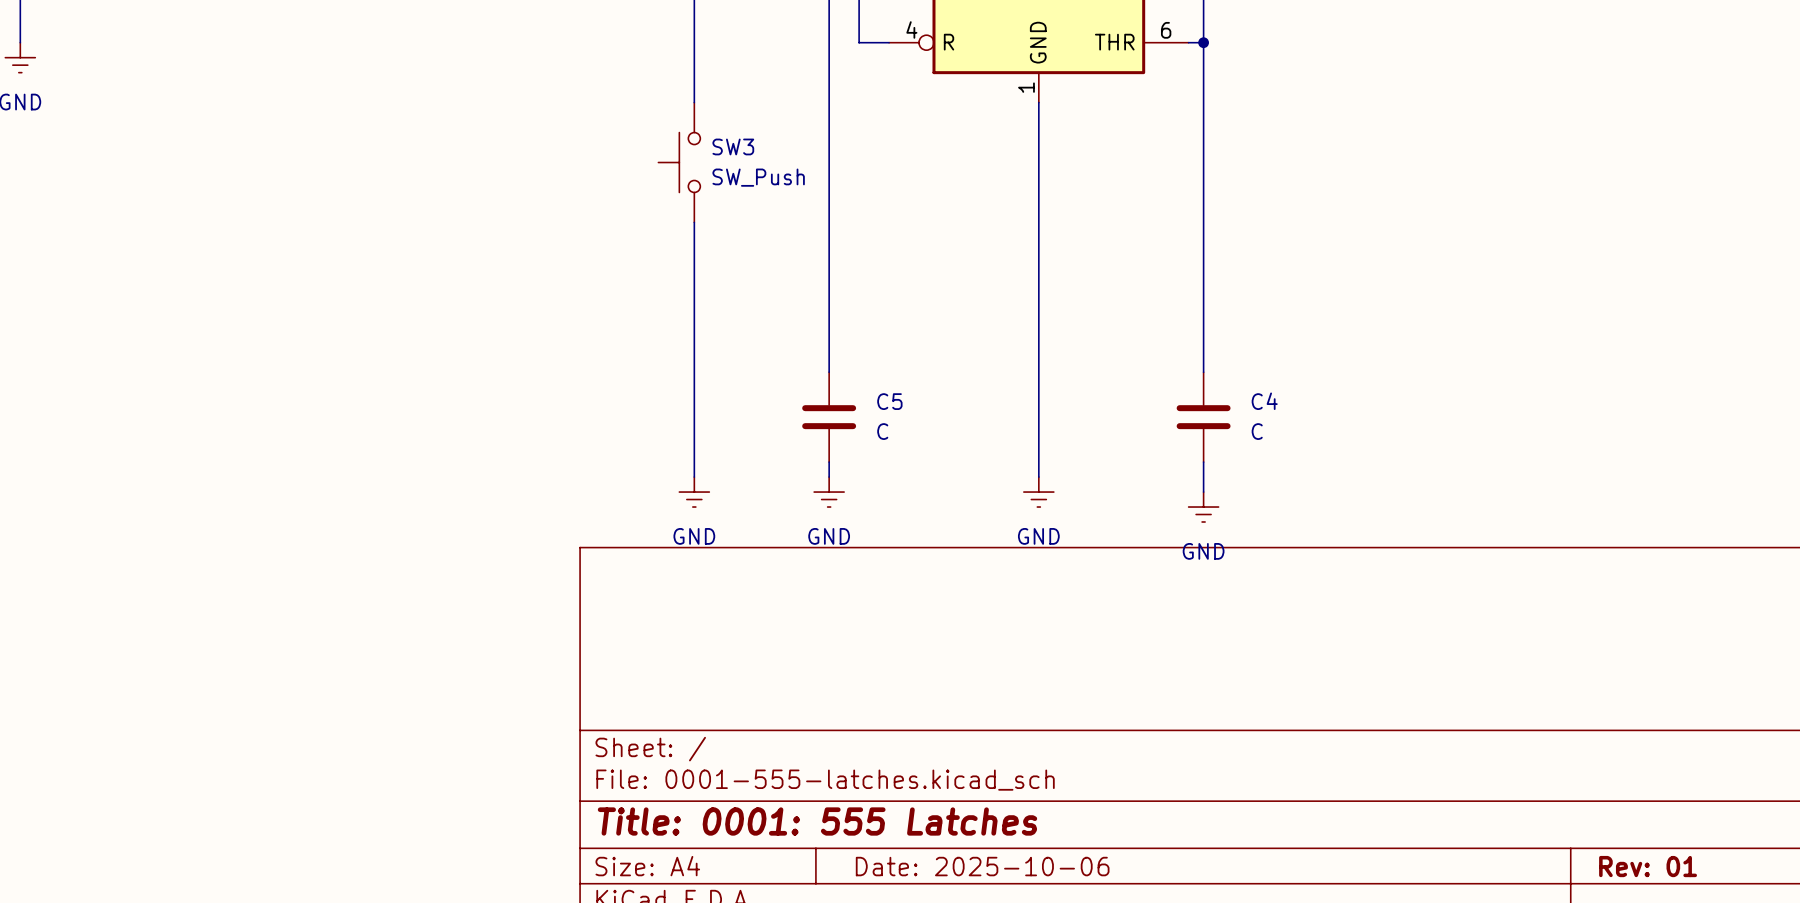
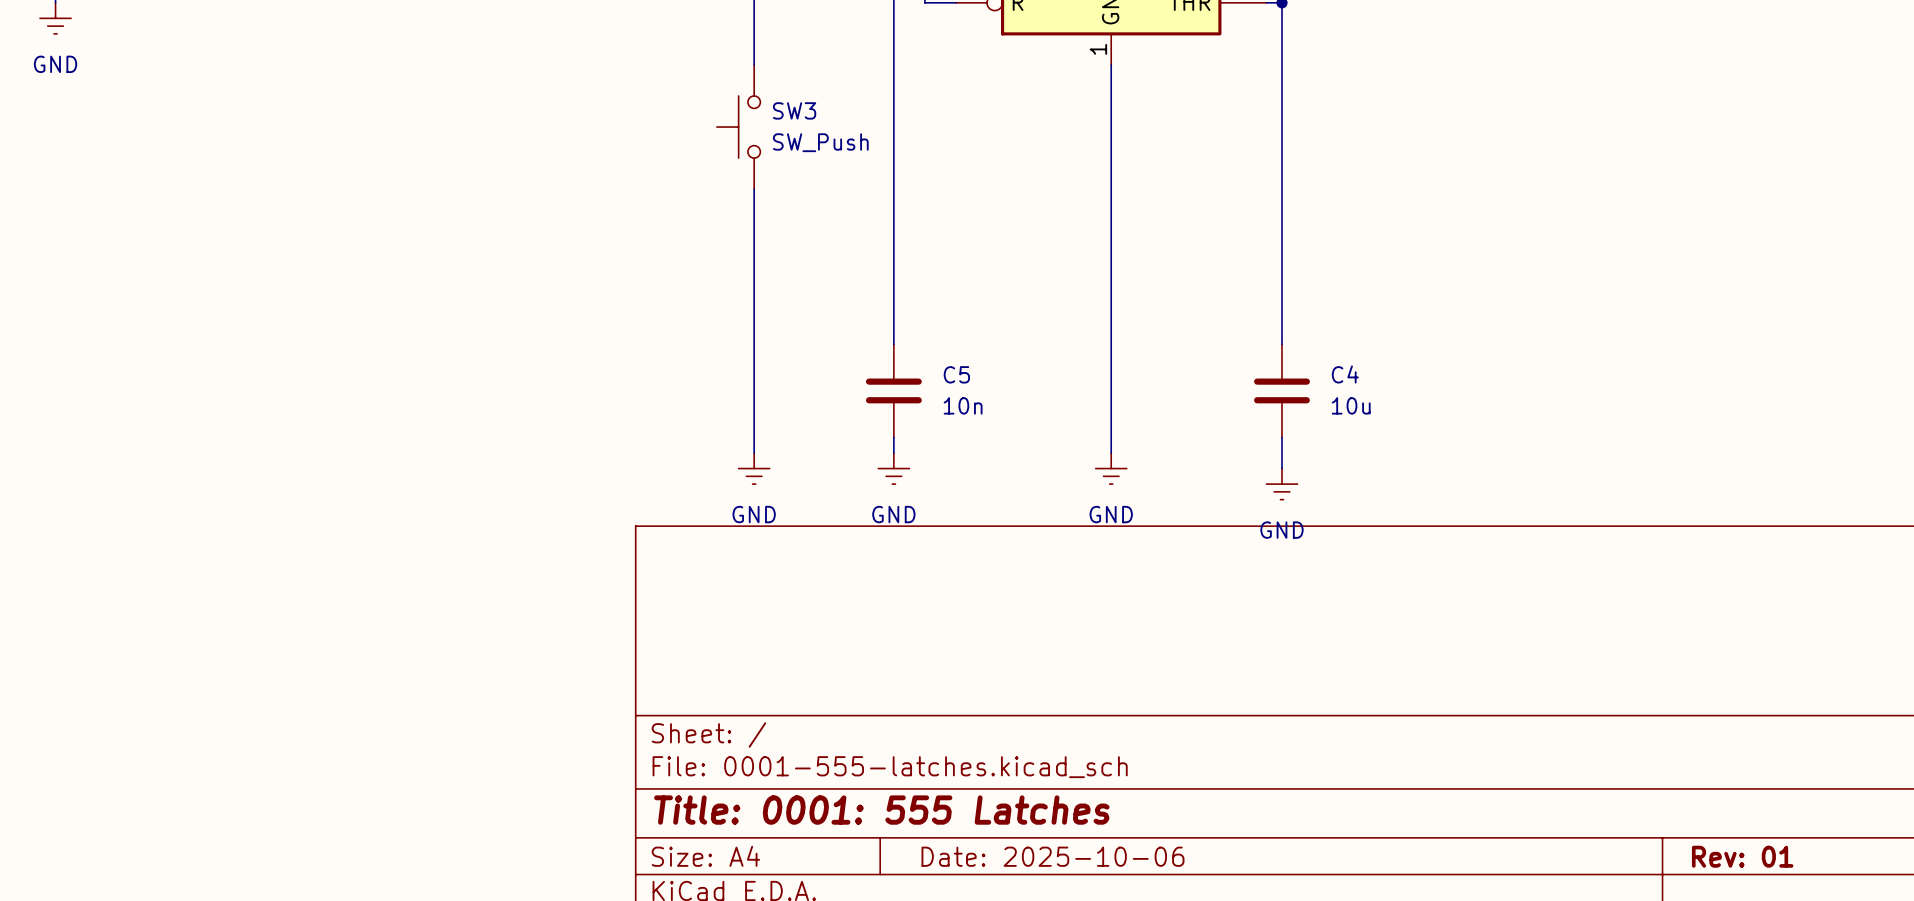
C5 value: C (882, 431) -> 10n (963, 405)
C4 value: C (1257, 431) -> 10u (1351, 405)

